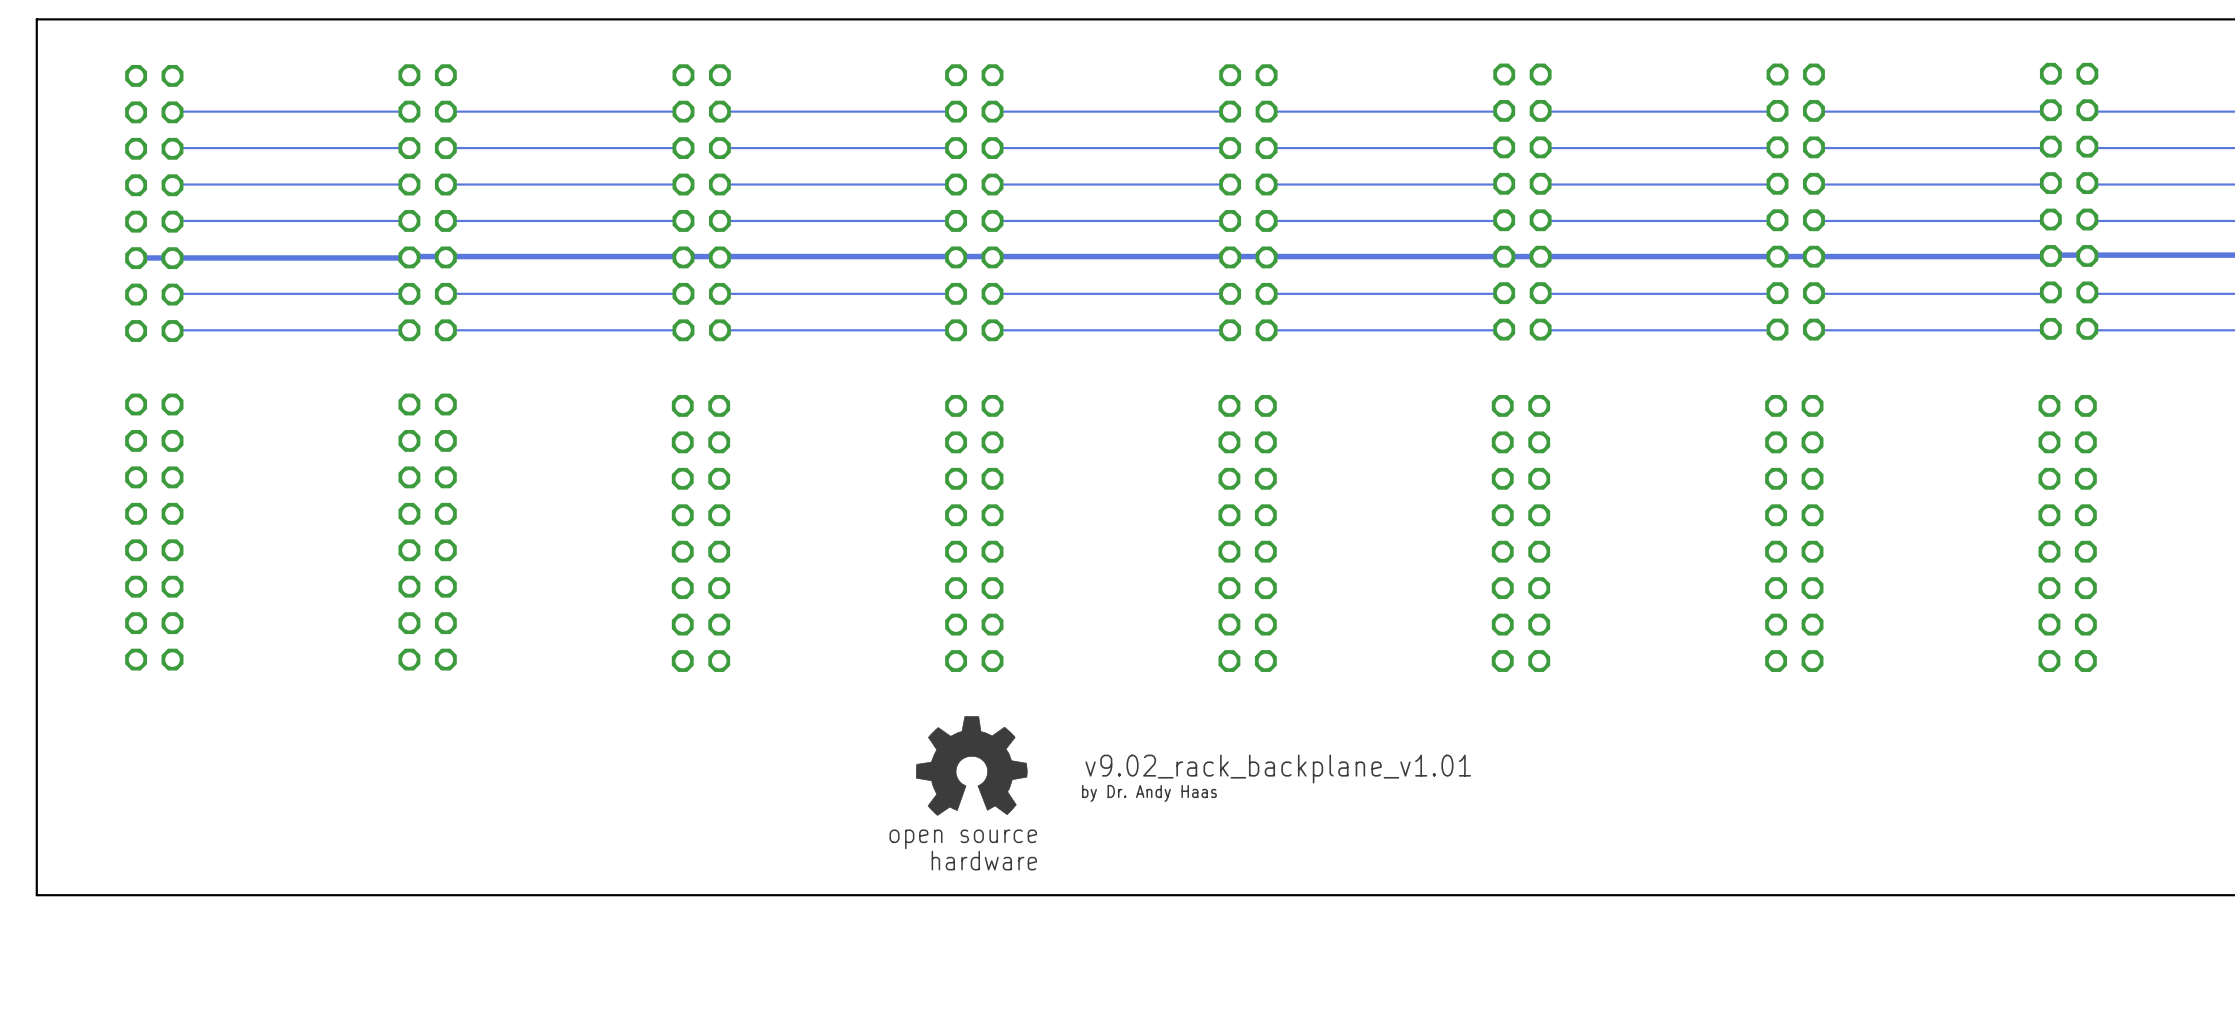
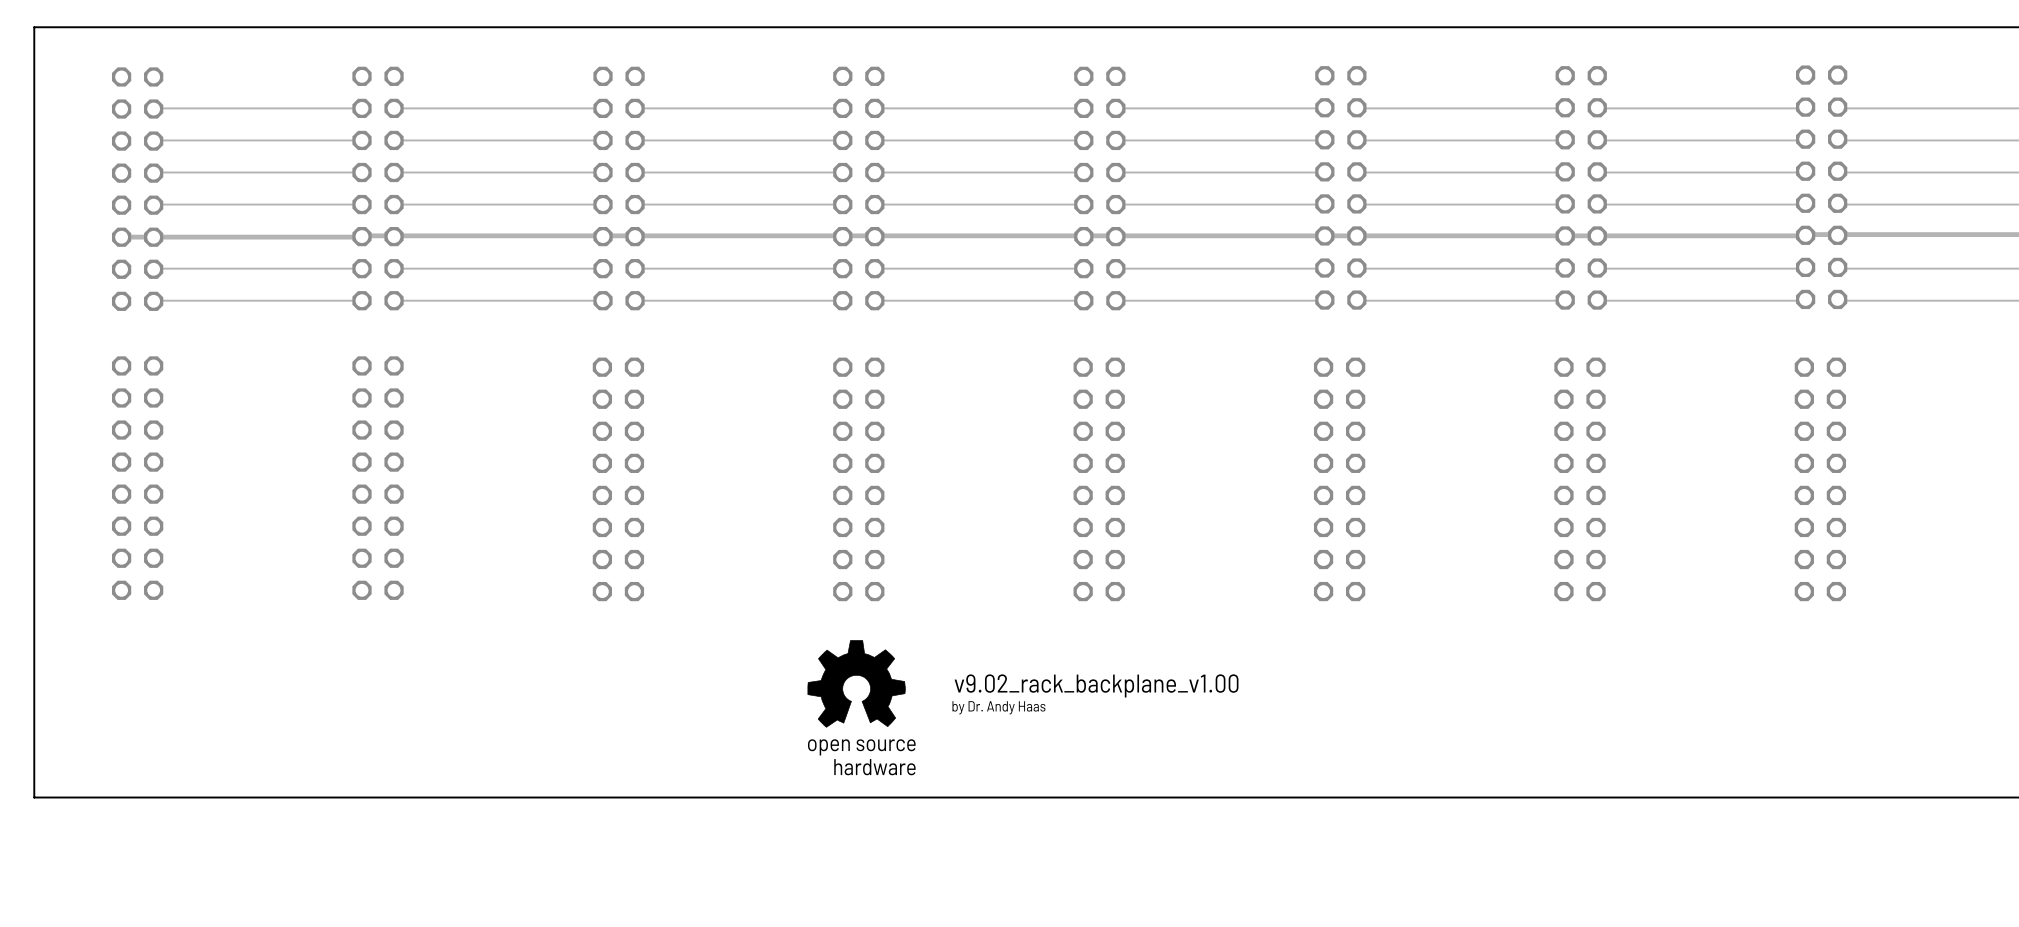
text: v9.02_rack_backplane_v1.01 (1278, 769) -> v9.02_rack_backplane_v1.00 (1096, 685)

